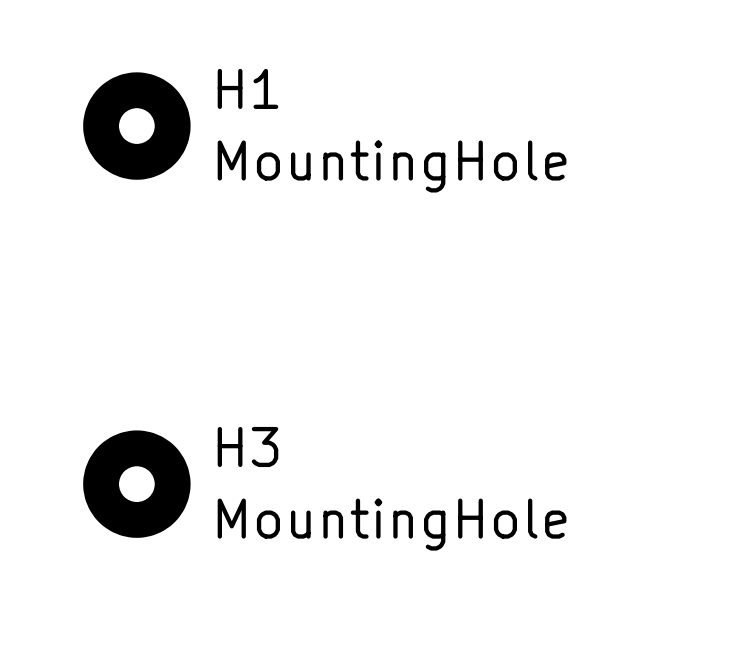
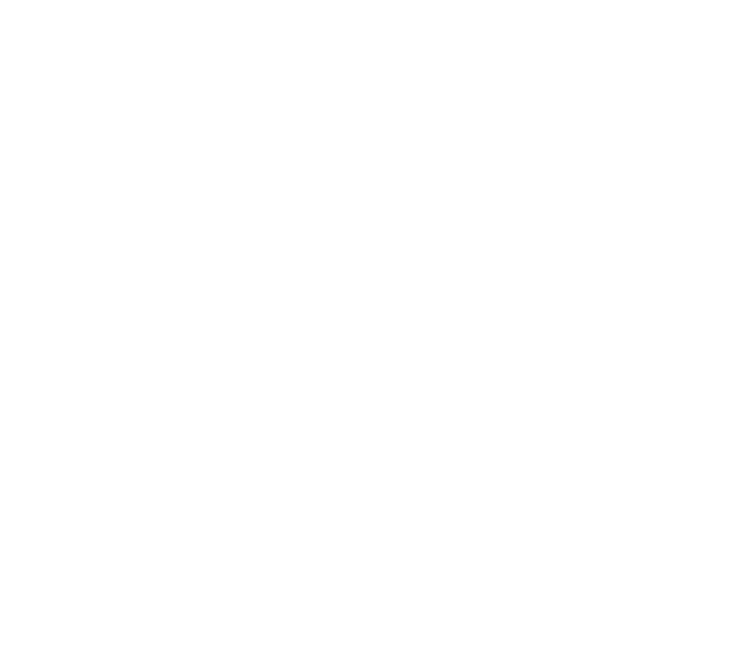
H1: MountingHole (136, 126) -> none
H3: MountingHole (136, 484) -> none

